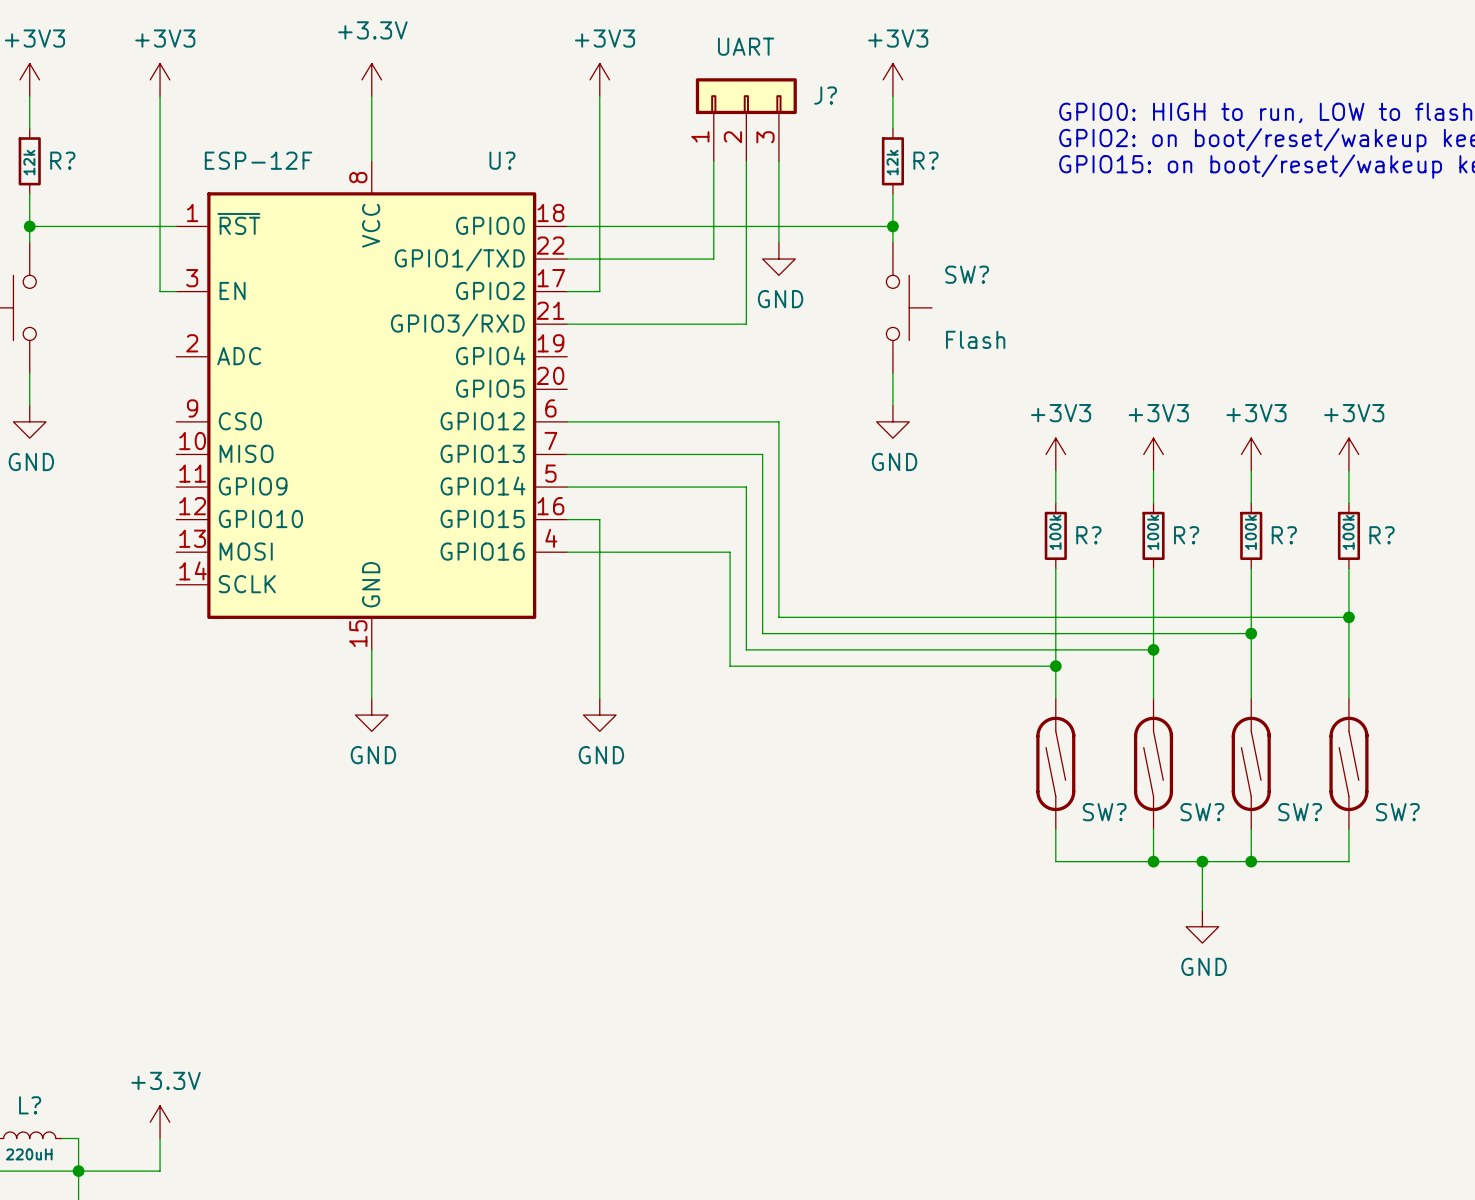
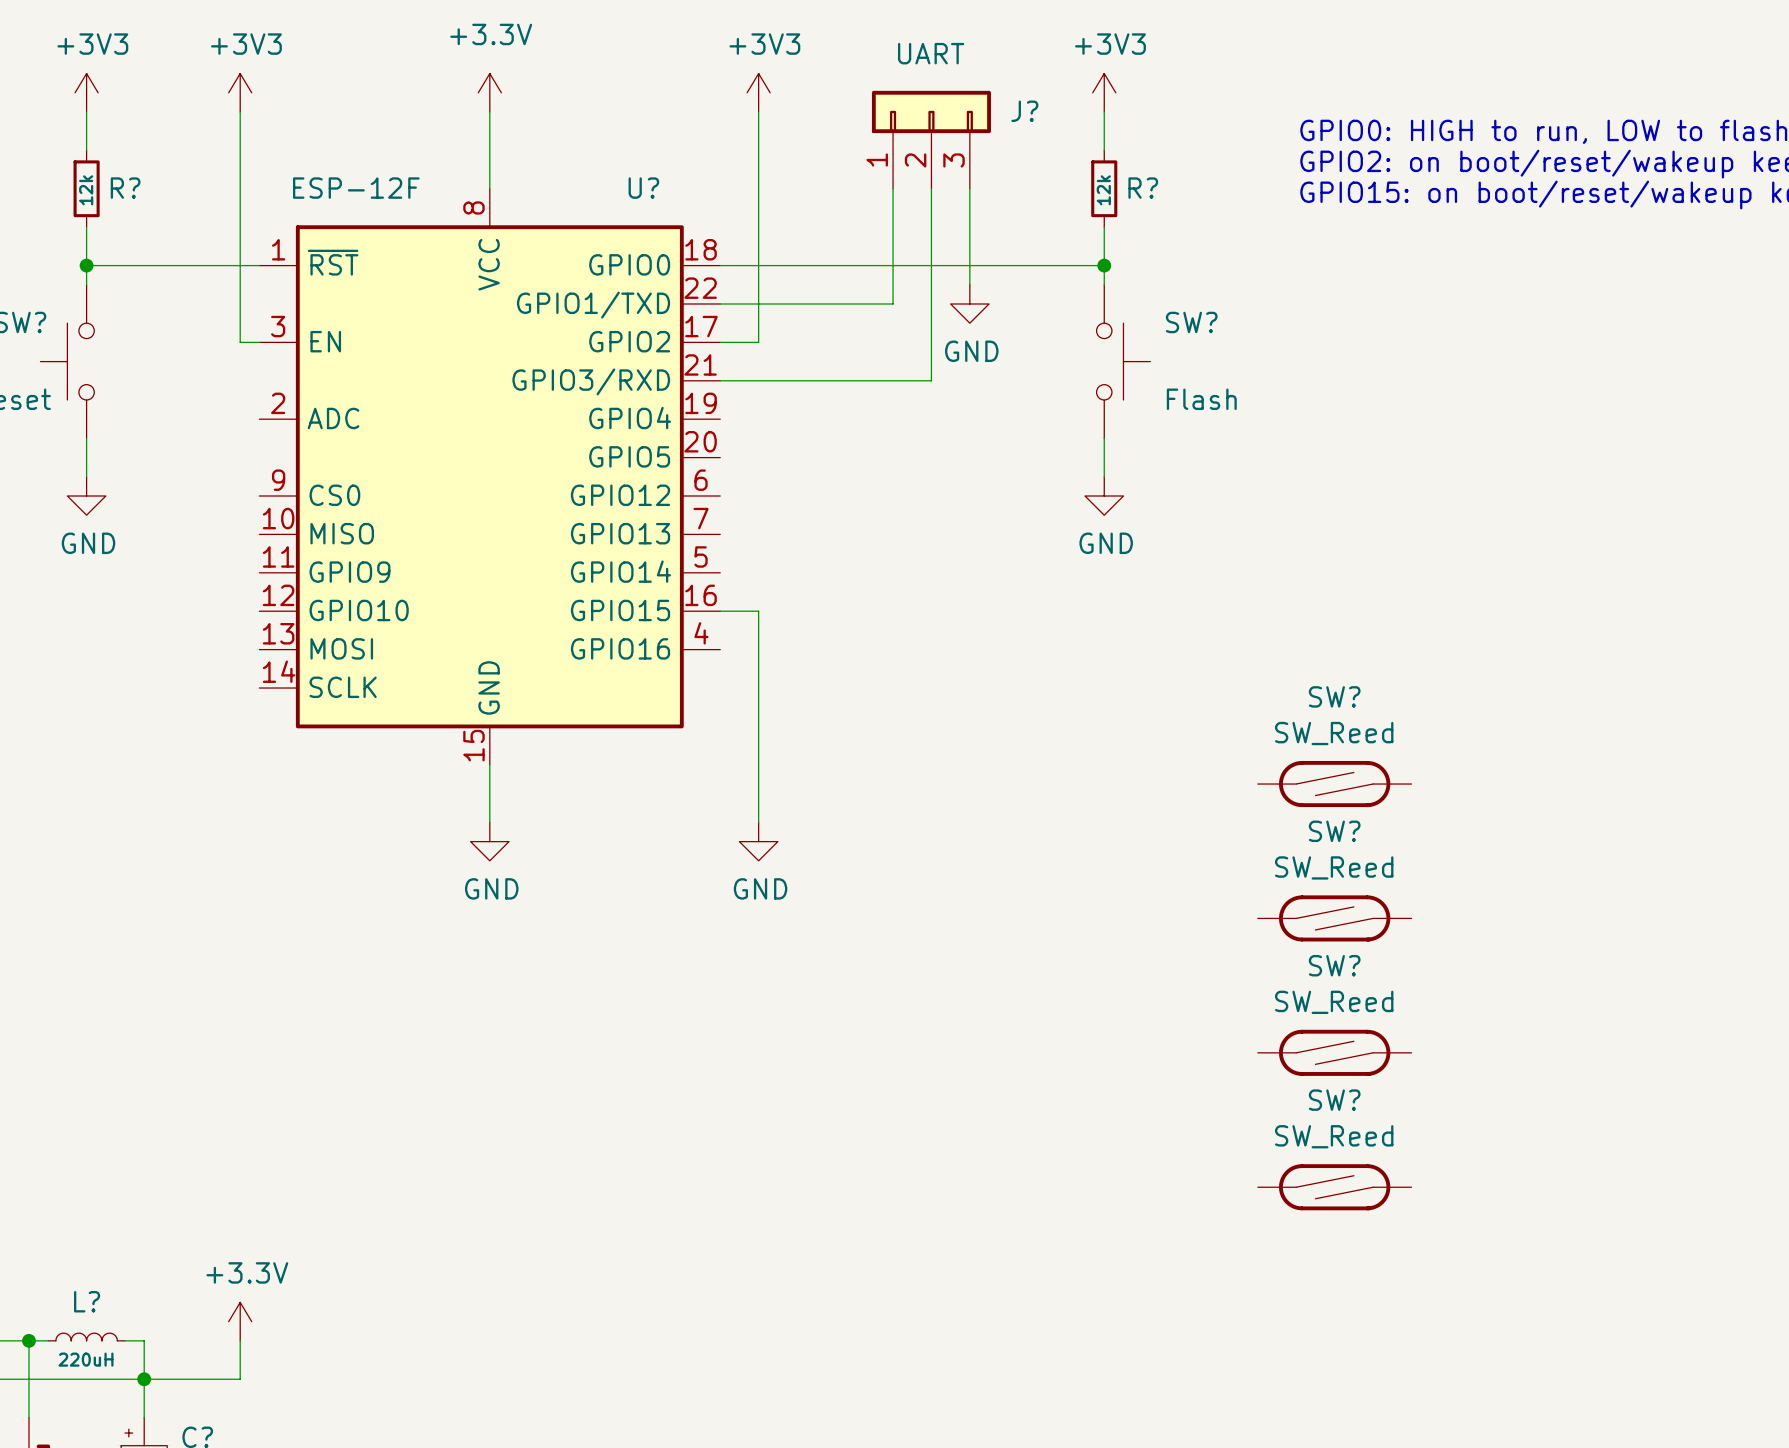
wire: (567, 421) (778, 421) (778, 617) (1348, 617) -> none
wire: (567, 454) (762, 454) (762, 633) (1251, 633) -> none
power symbol: +3V3 (1055, 454) -> none
power symbol: +3V3 (1153, 454) -> none
power symbol: +3V3 (1251, 454) -> none
power symbol: +3V3 (1348, 454) -> none
wire: (1055, 470) (1055, 503) -> none
wire: (1153, 470) (1153, 503) -> none
wire: (1251, 470) (1251, 503) -> none
wire: (1348, 470) (1348, 503) -> none
wire: (567, 487) (746, 487) (746, 649) (1153, 649) -> none
R?: 100k (1055, 535) -> none
R?: 100k (1153, 535) -> none
R?: 100k (1251, 535) -> none
R?: 100k (1348, 535) -> none
wire: (567, 552) (730, 552) (730, 666) (1055, 666) -> none
wire: (1055, 568) (1055, 698) -> none
wire: (1153, 568) (1153, 698) -> none
wire: (1251, 568) (1251, 698) -> none
wire: (1348, 568) (1348, 698) -> none
junction: (1348, 617) -> none
junction: (1251, 633) -> none
junction: (1153, 649) -> none
junction: (1055, 666) -> none
SW?: none -> SW_Reed (1334, 784)
SW?: (1055, 763) -> none
SW?: (1153, 763) -> none
SW?: (1251, 763) -> none
SW?: (1348, 763) -> none
SW?: none -> SW_Reed (1334, 918)
wire: (1055, 829) (1055, 861) (1348, 861) (1348, 829) -> none
wire: (1153, 829) (1153, 861) -> none
wire: (1251, 829) (1251, 861) -> none
junction: (1153, 861) -> none
wire: (1202, 861) (1202, 910) -> none
junction: (1202, 861) -> none
junction: (1251, 861) -> none
SW?: none -> SW_Reed (1334, 1052)
power symbol: GND (1202, 926) -> none
SW?: none -> SW_Reed (1334, 1187)

